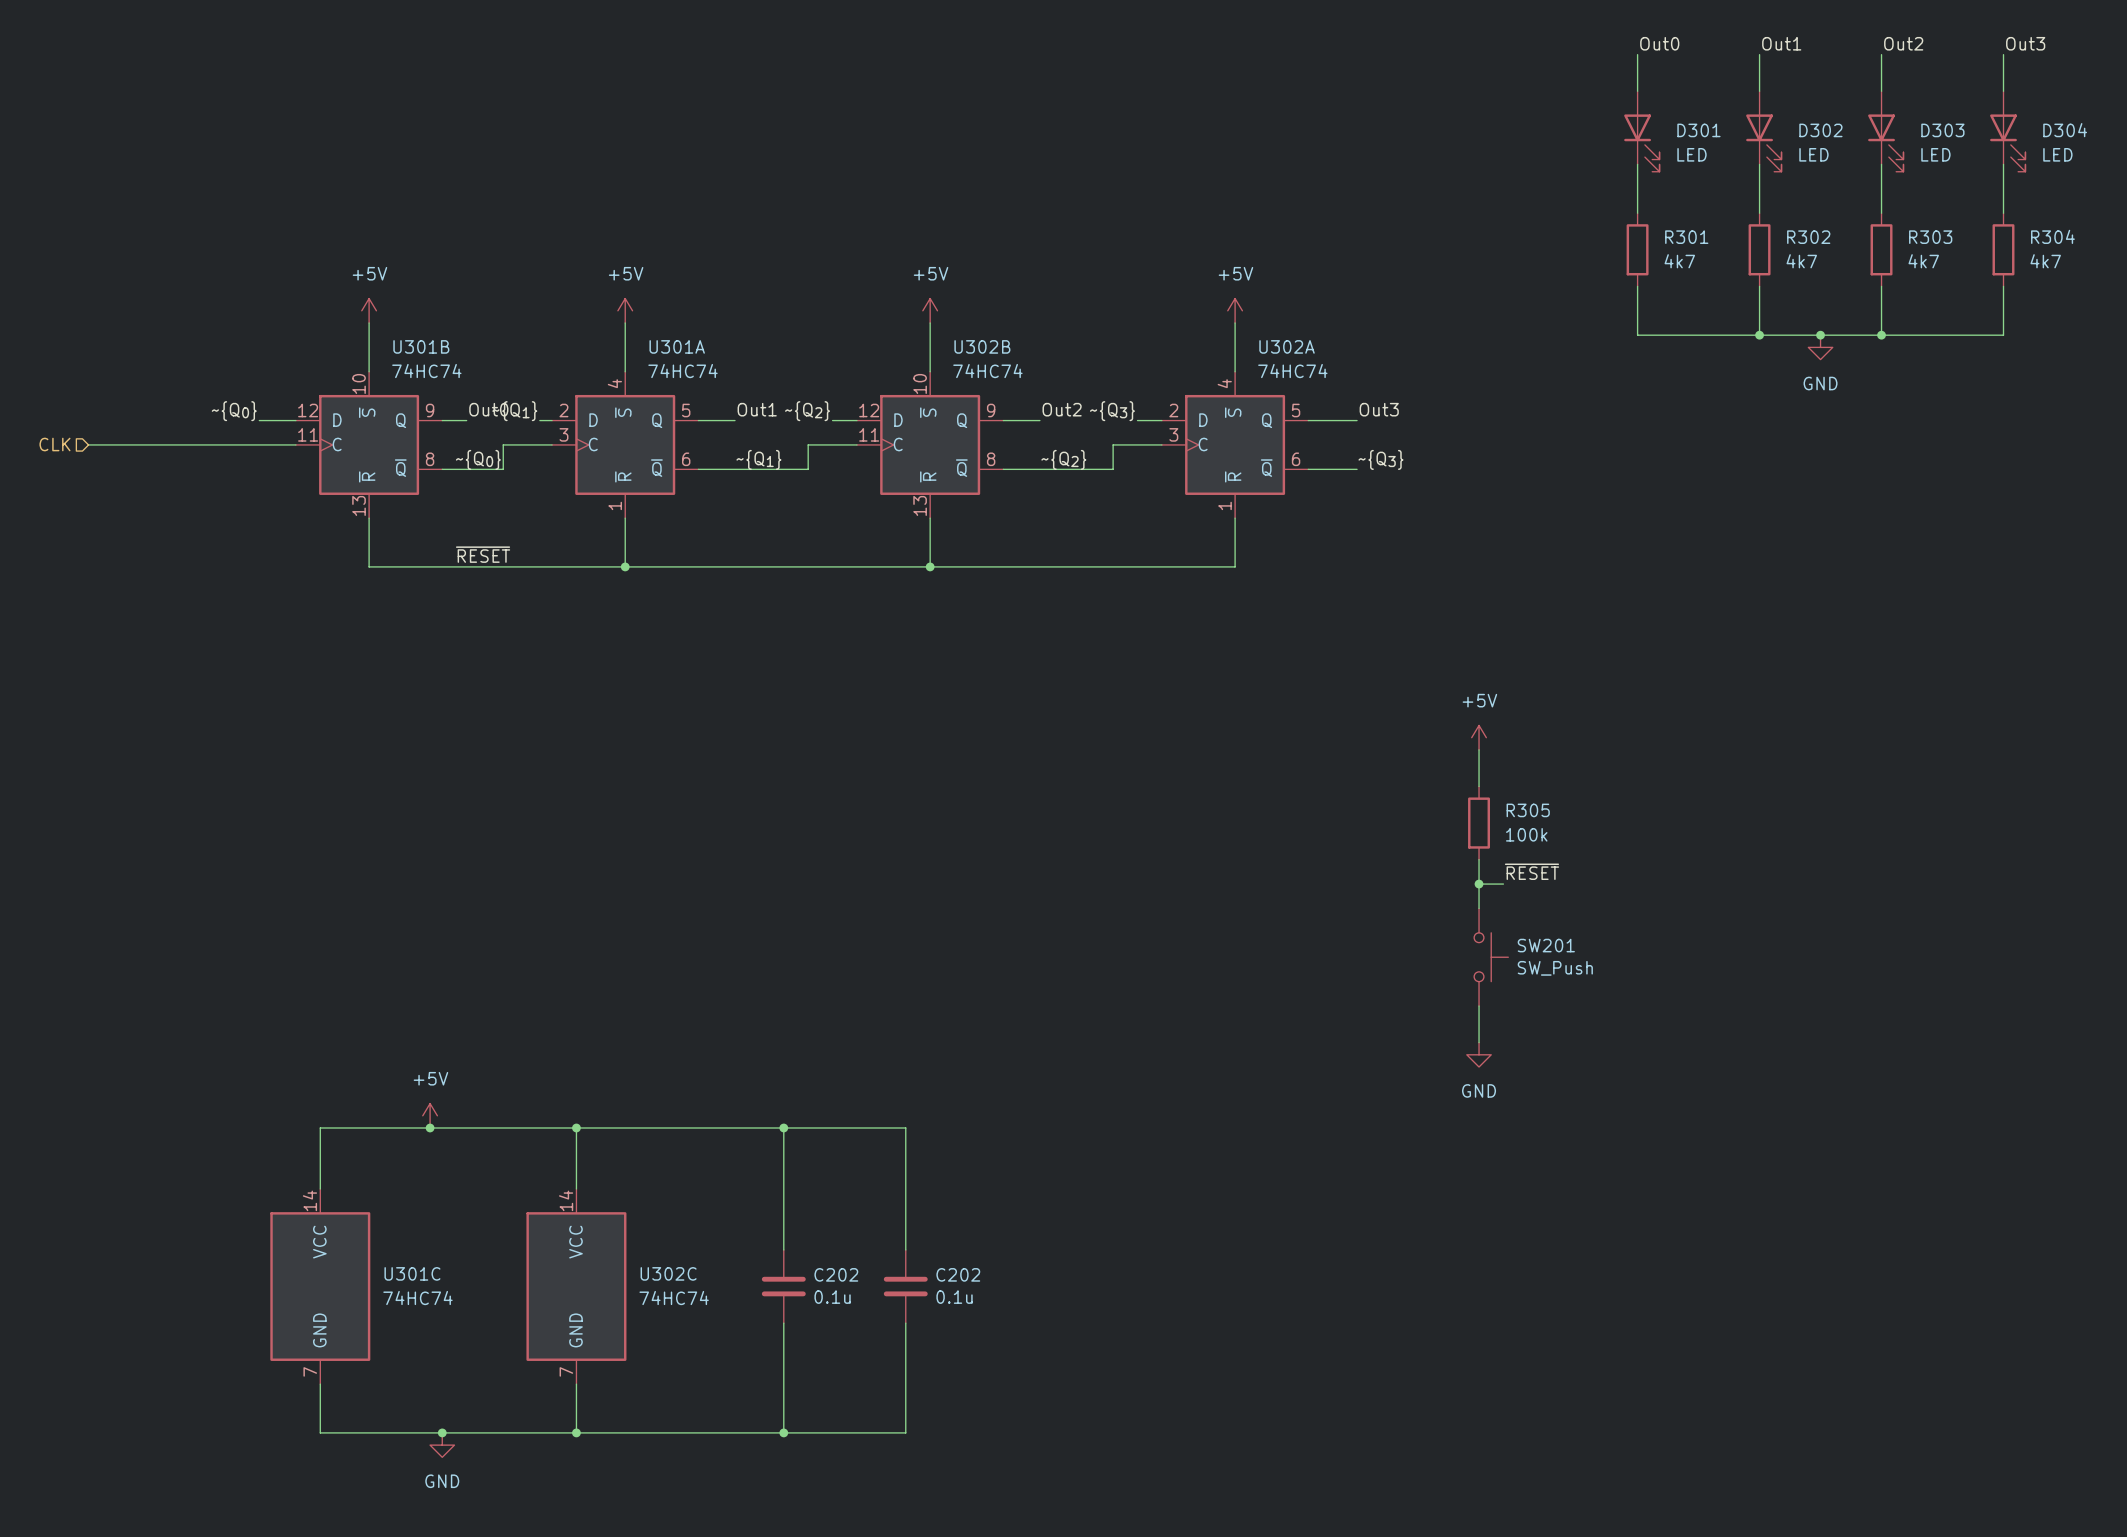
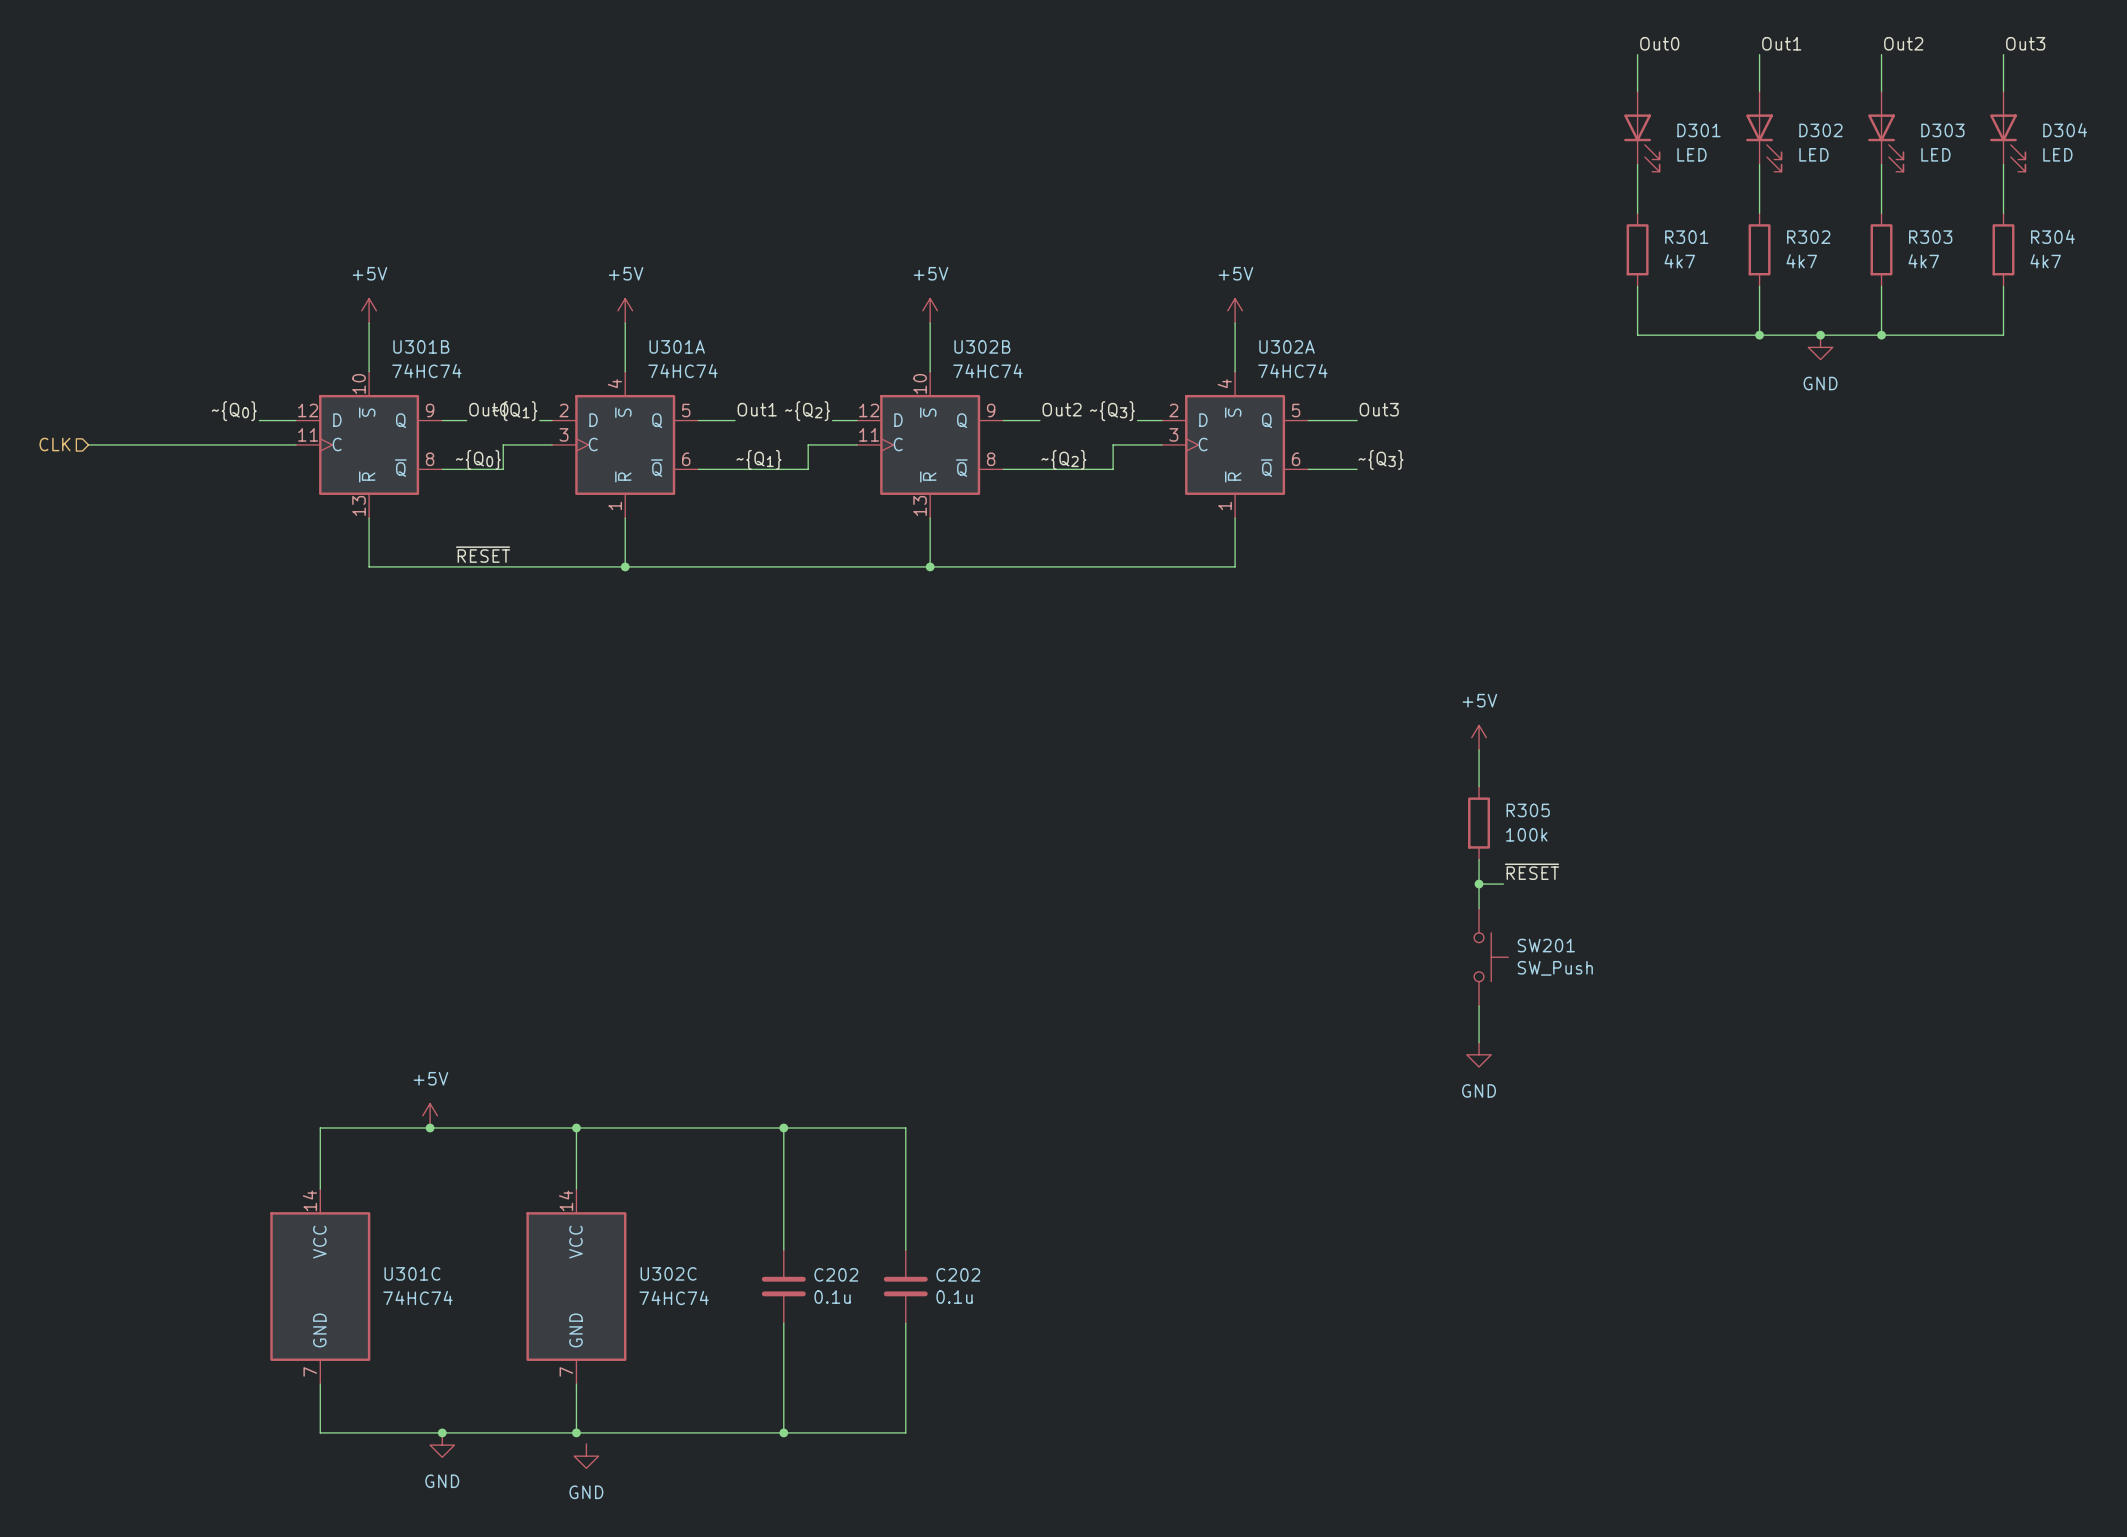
power symbol: none -> GND (586, 1456)

